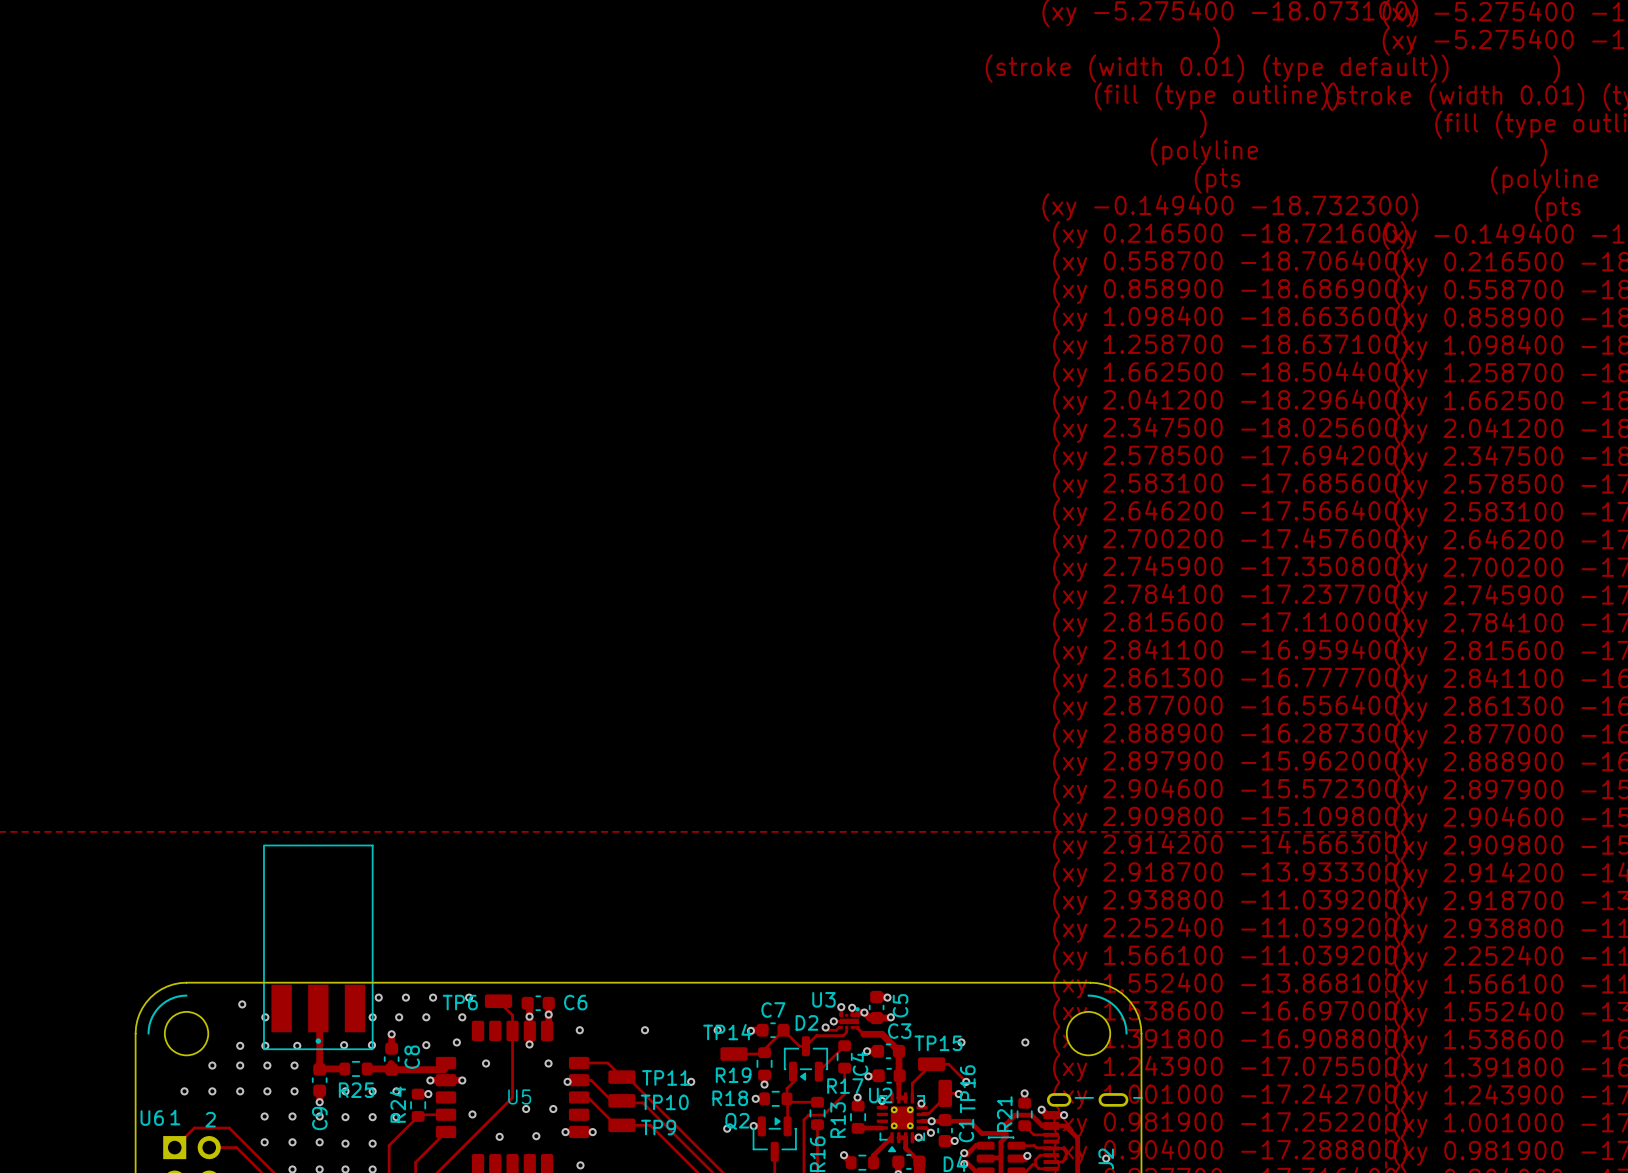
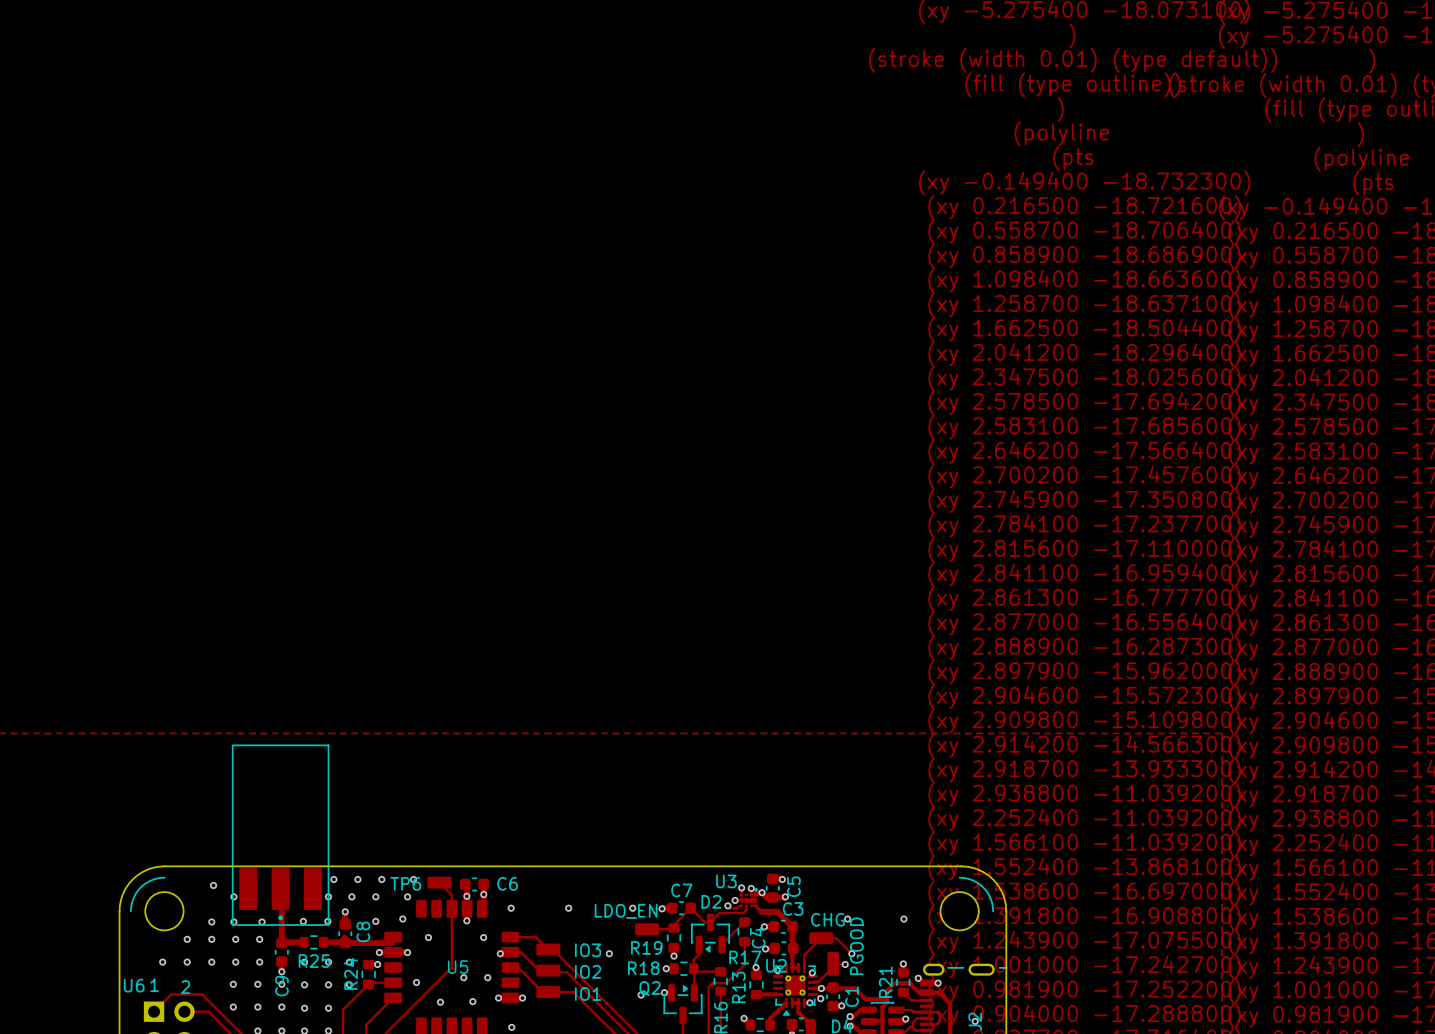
TP14 name: TP14 (727, 1032) -> LDO_EN (626, 911)
TP15 name: TP15 (938, 1043) -> CHG (827, 919)
TP11 name: TP11 (666, 1077) -> IO3 (588, 950)
TP16 name: TP16 (967, 1089) -> PGOOD (856, 946)
TP10 name: TP10 (664, 1102) -> IO2 (588, 971)
TP9 name: TP9 (658, 1127) -> IO1 (588, 994)

